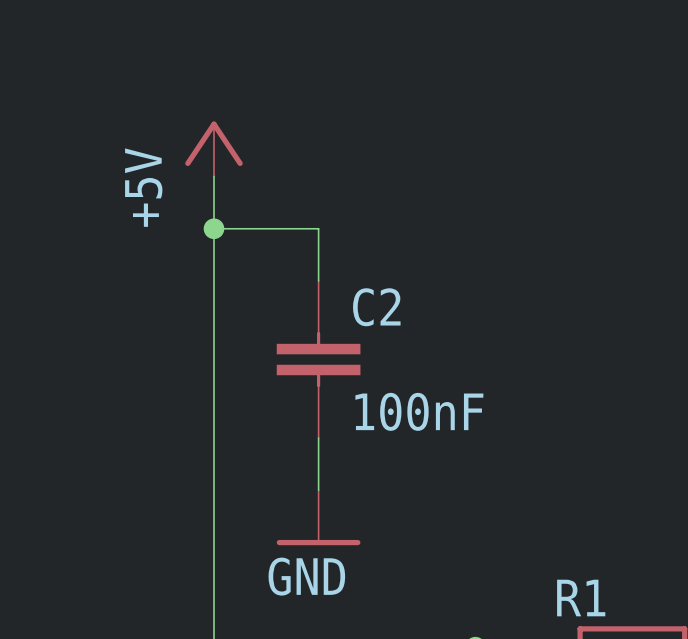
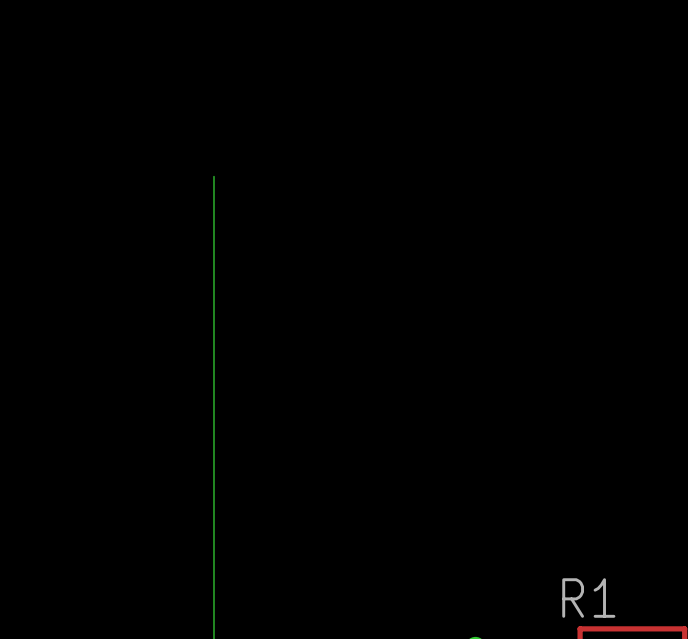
power symbol: +5V (213, 149) -> none
wire: (213, 228) (318, 228) (318, 281) -> none
junction: (213, 228) -> none
C2: 100nF (318, 359) -> none
wire: (318, 437) (318, 490) -> none
power symbol: GND (318, 517) -> none

